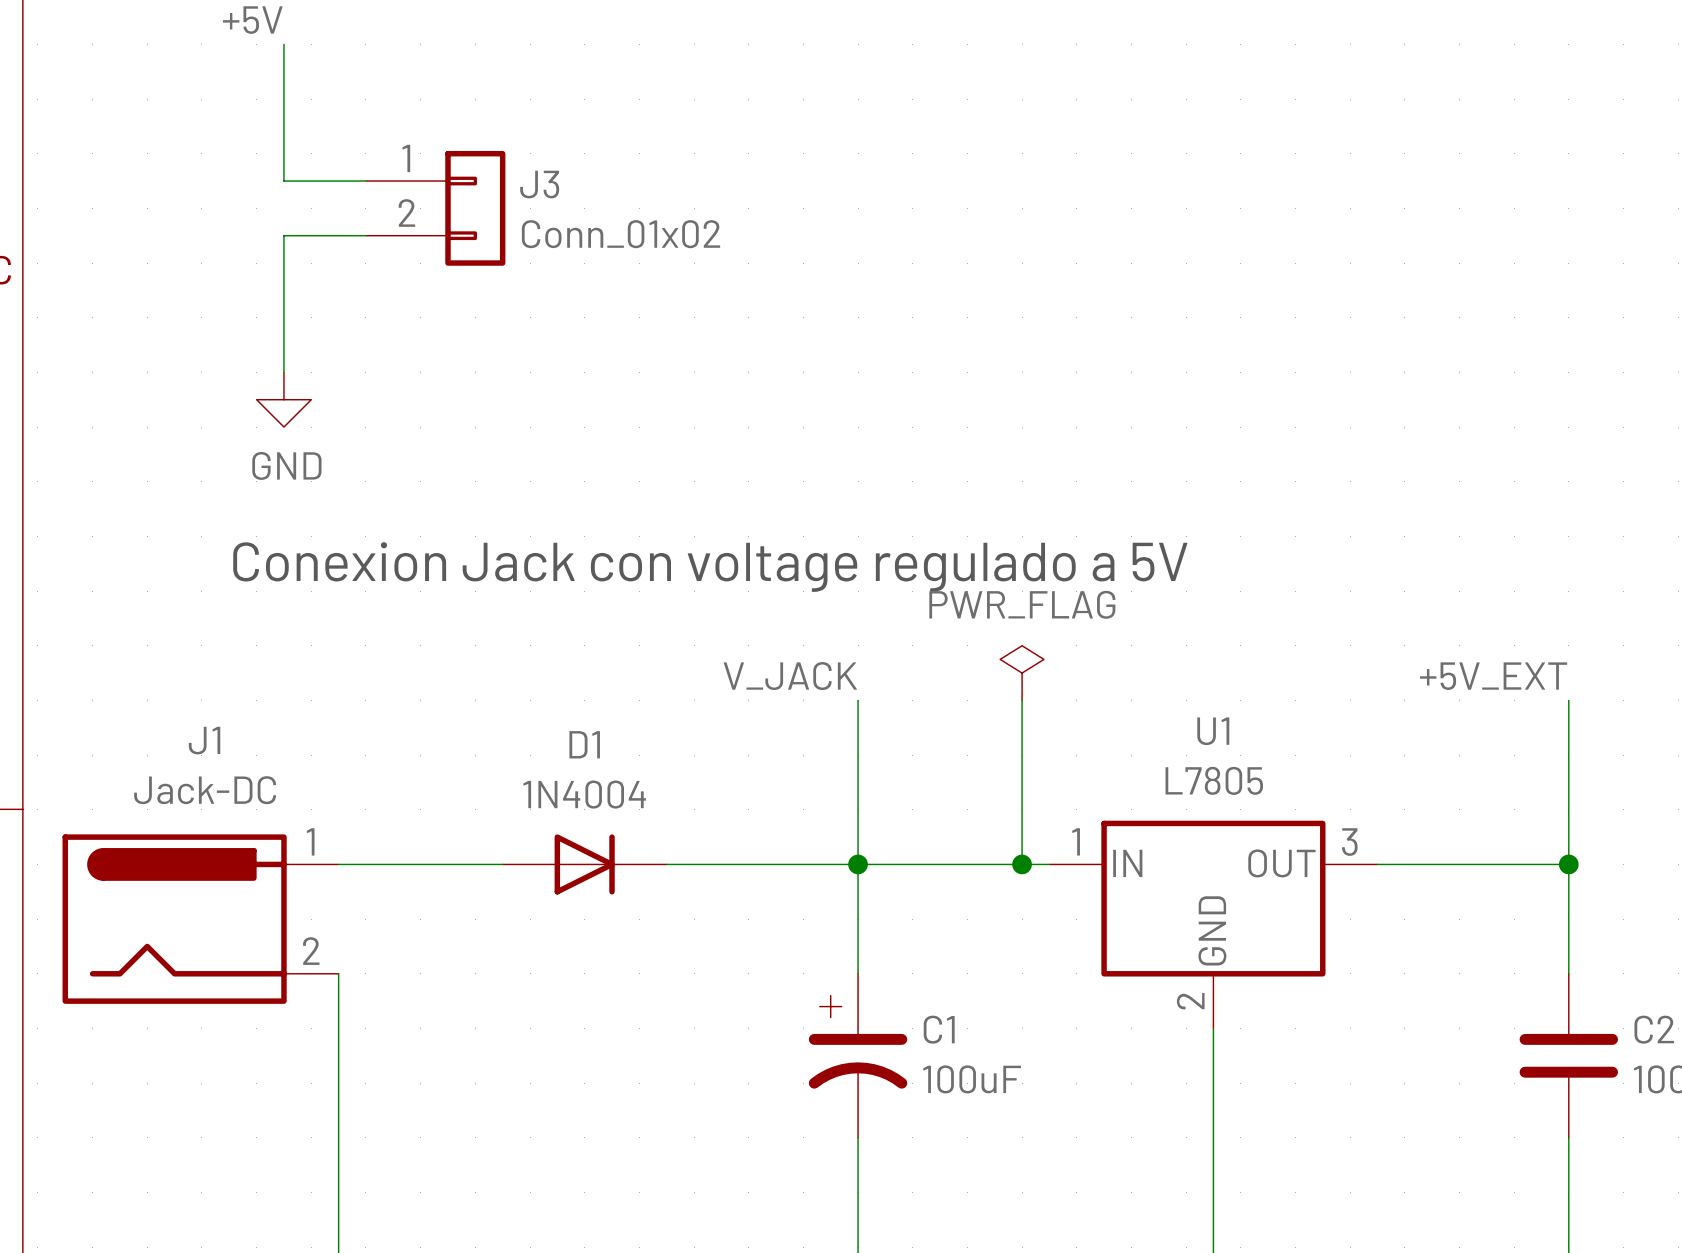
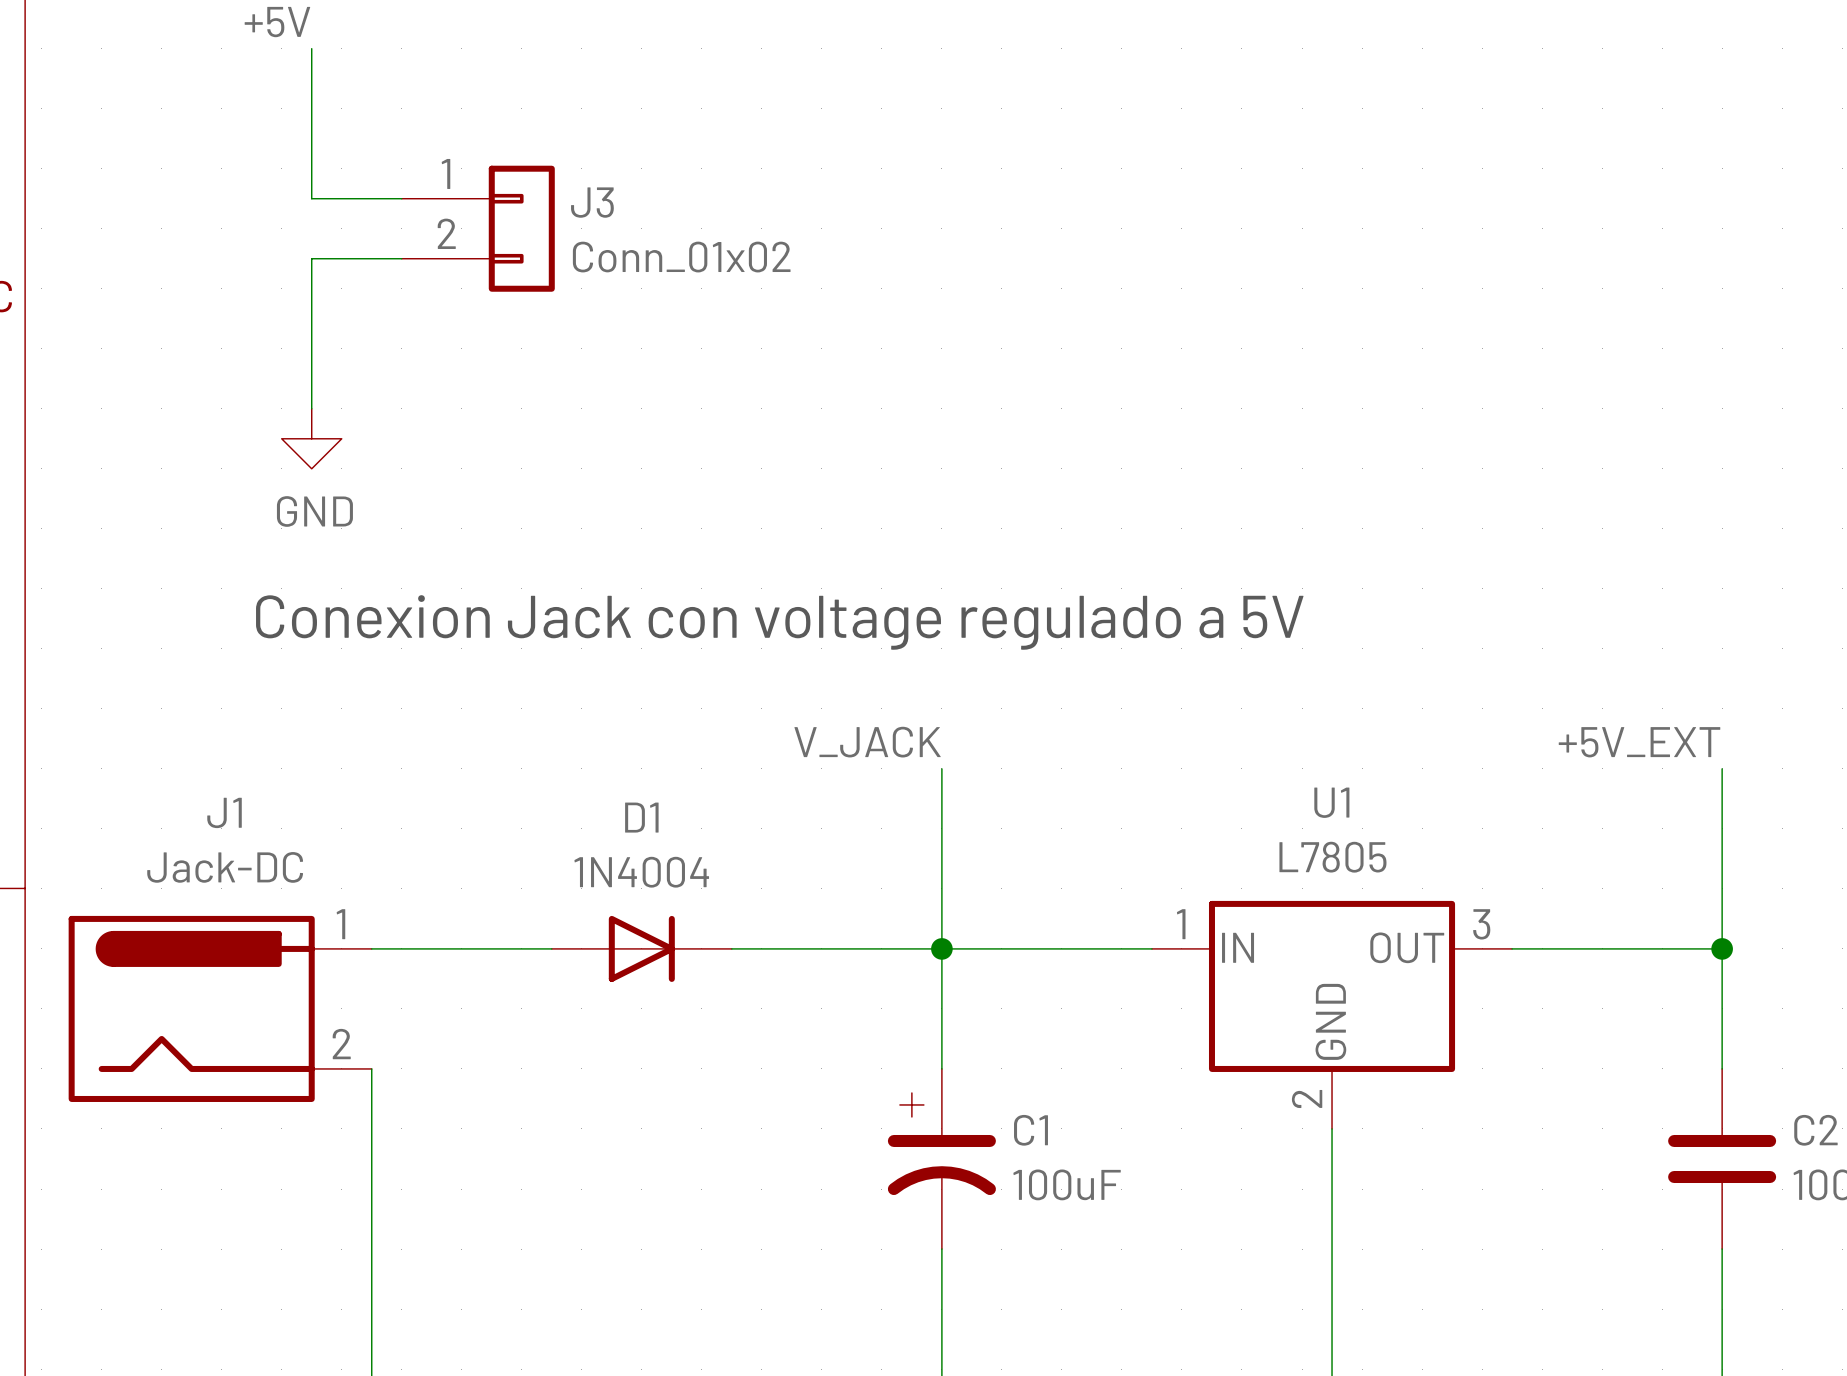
power symbol: PWR_FLAG (1022, 673) -> none
wire: (1022, 700) (1022, 864) -> none
junction: (1022, 864) -> none

